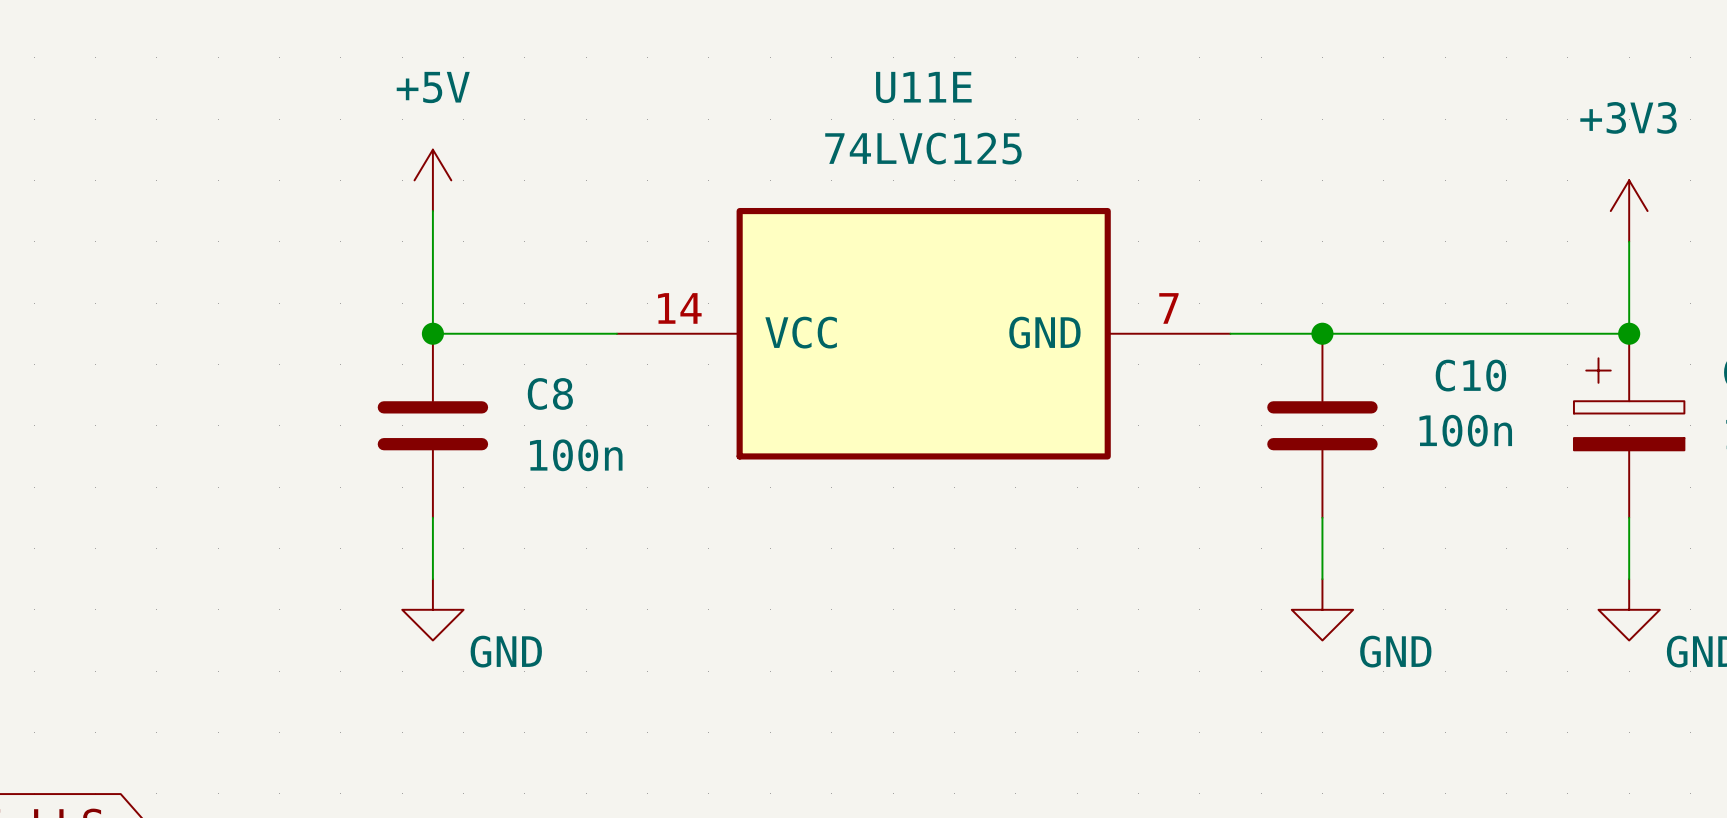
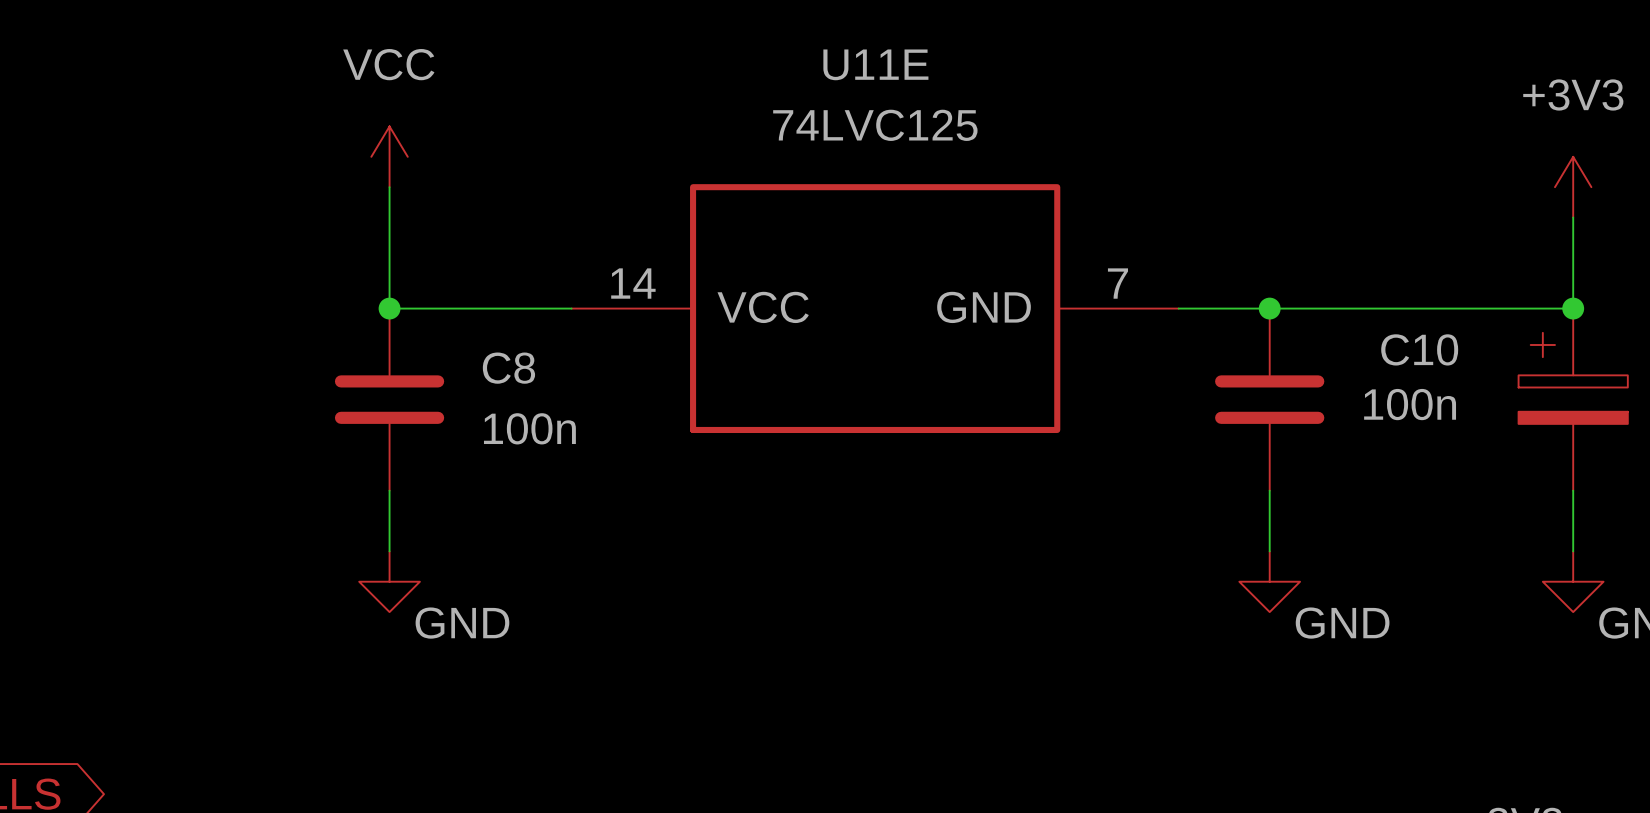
power symbol: +5V (432, 180) -> VCC (389, 156)

